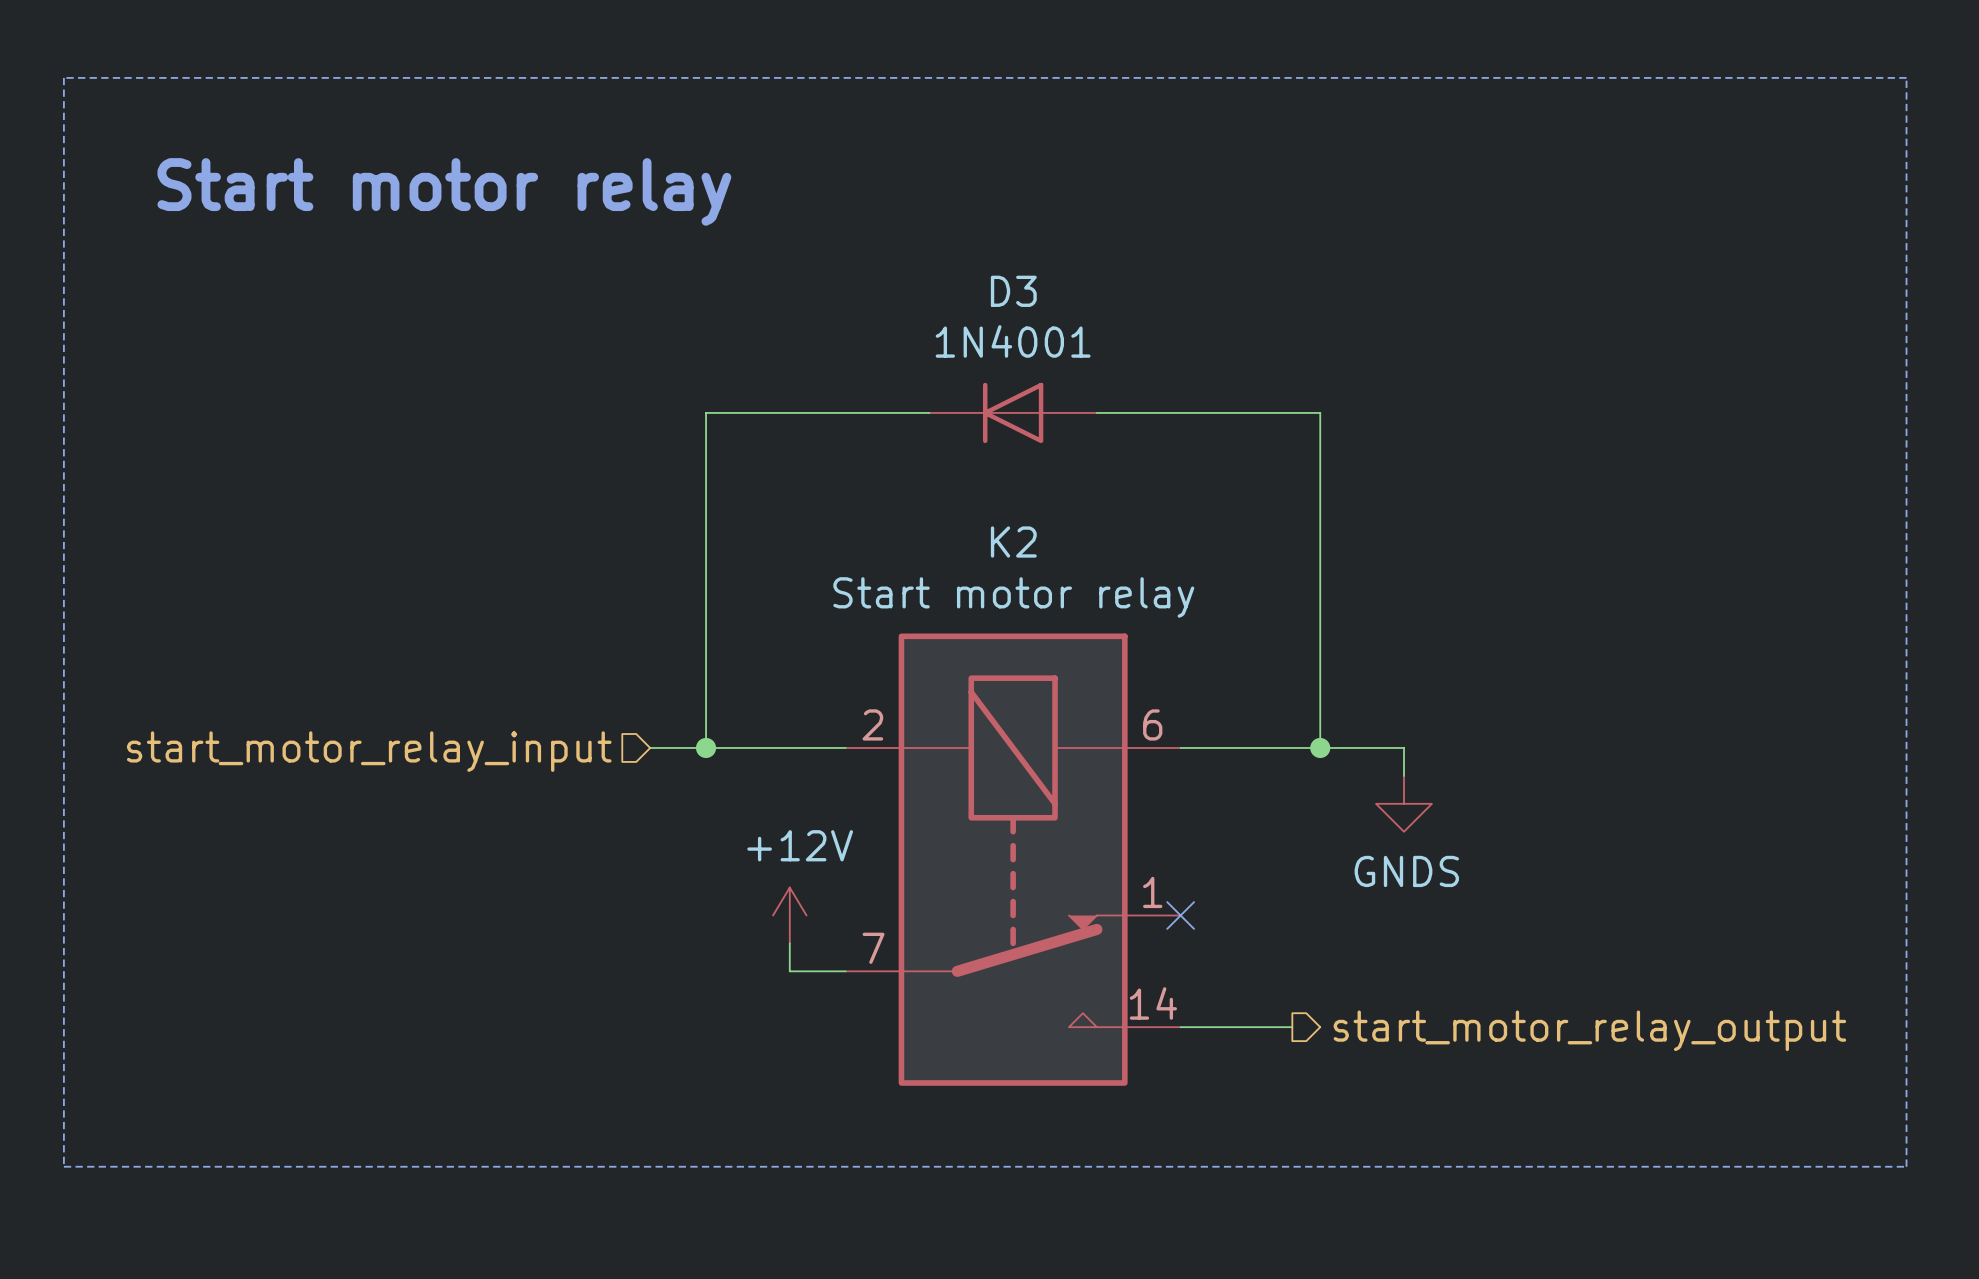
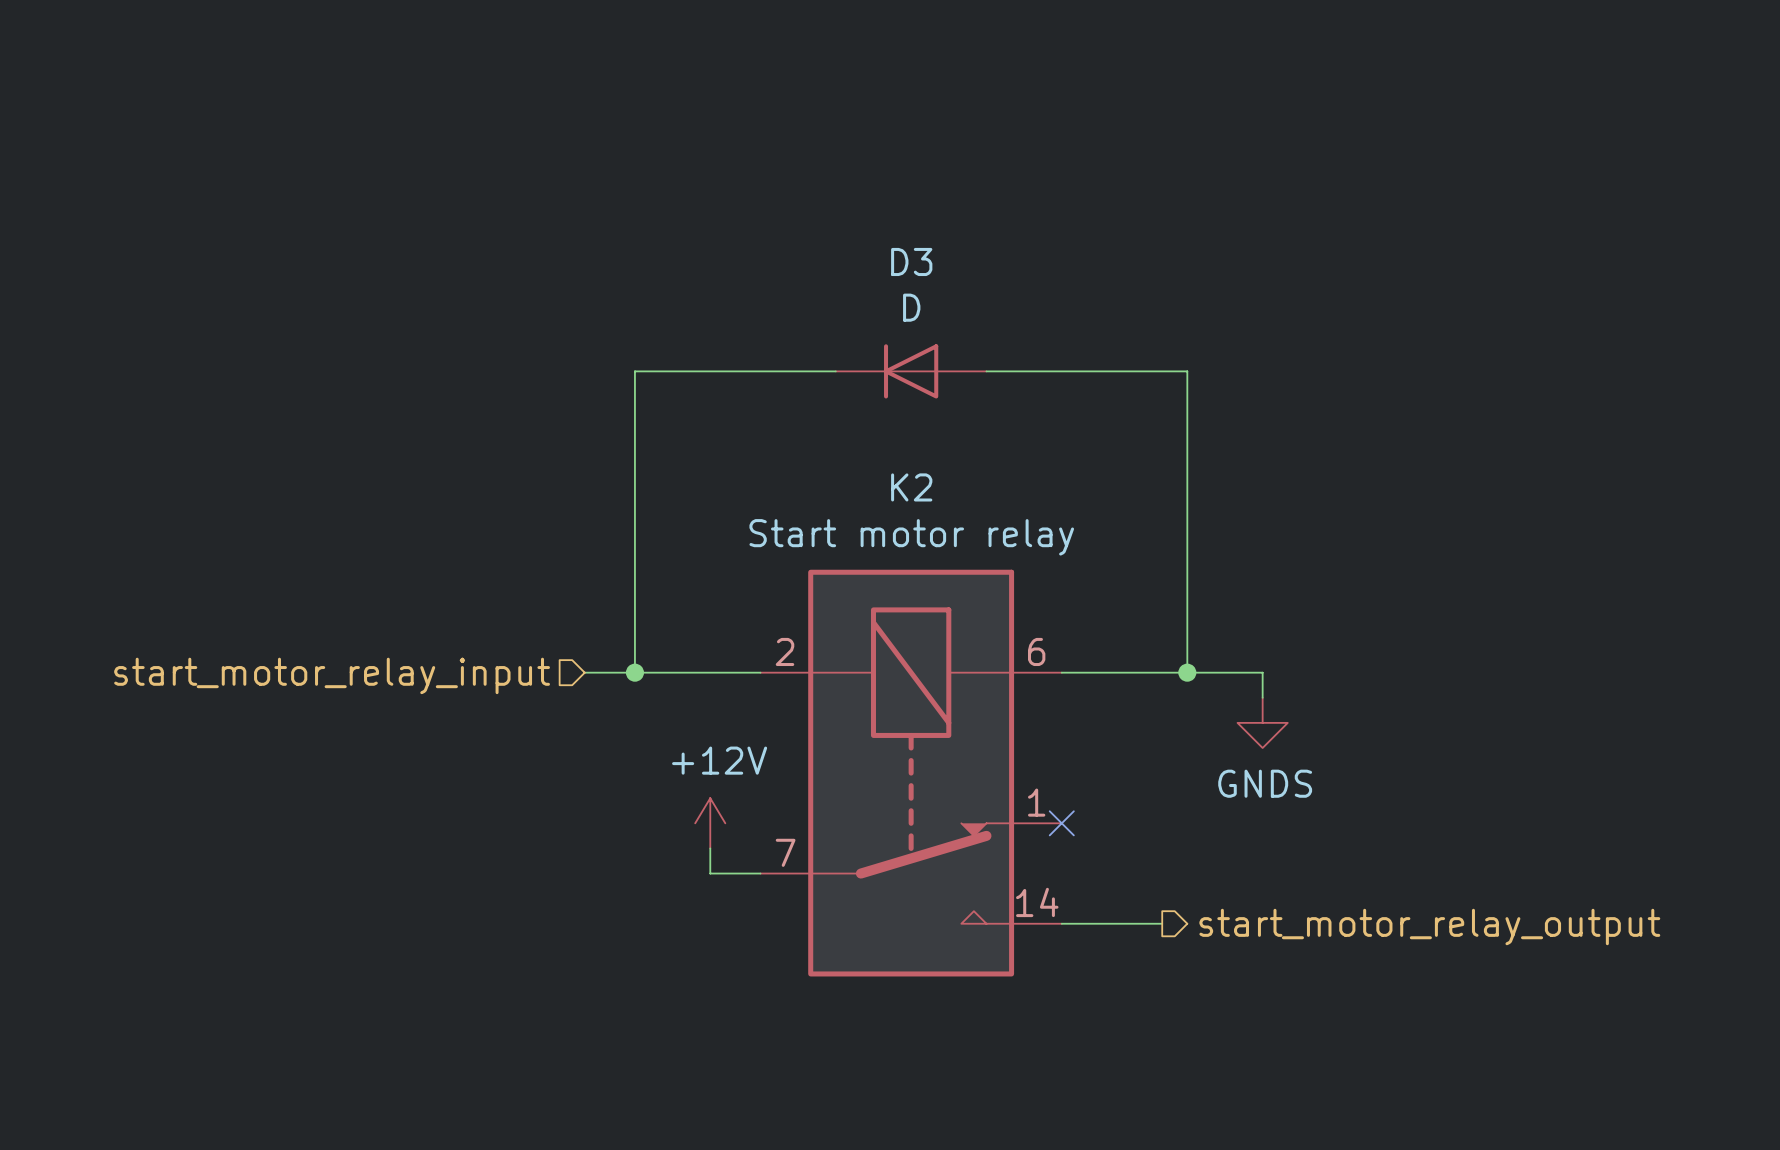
line: (63, 77) (63, 1166) (1906, 1166) (1906, 77) (63, 77) -> none
text: Start motor relay (444, 191) -> none
D3 value: 1N4001 (1013, 341) -> D (911, 307)

